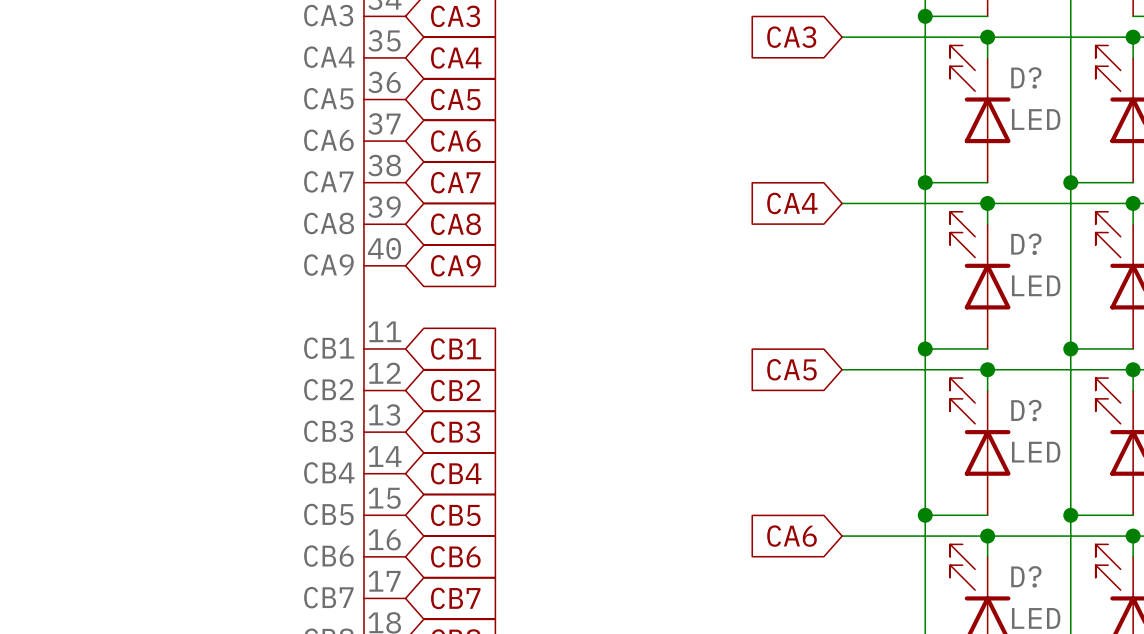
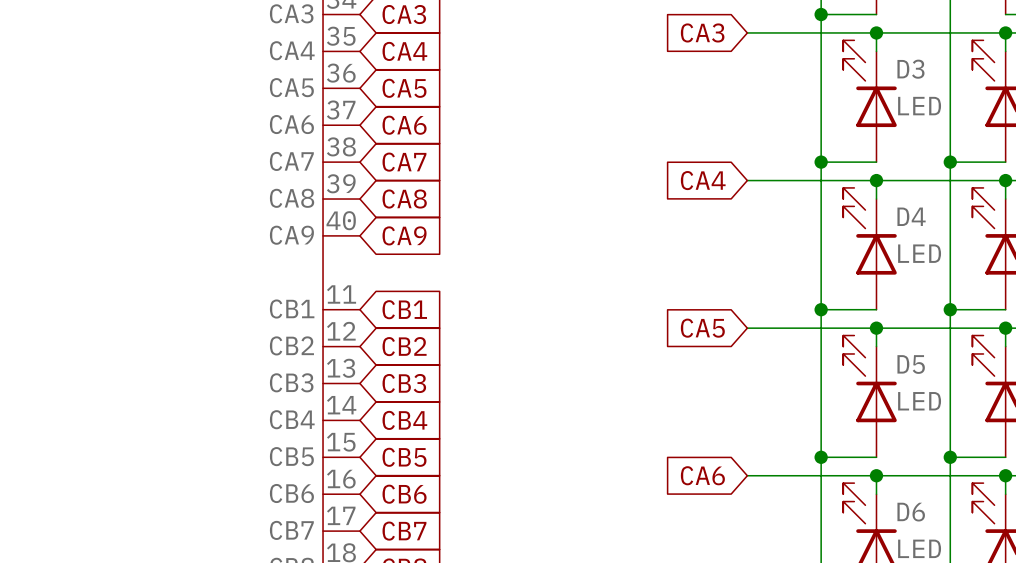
D? name: D? (1026, 77) -> D3 (910, 69)
D? name: D? (1026, 244) -> D4 (911, 216)
D? name: D? (1026, 410) -> D5 (911, 364)
D? name: D? (1026, 576) -> D6 (911, 512)

